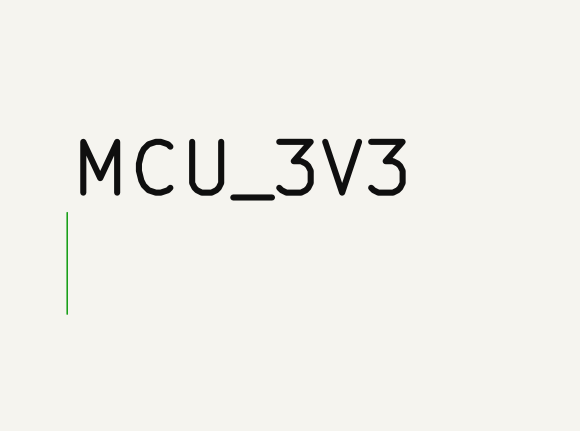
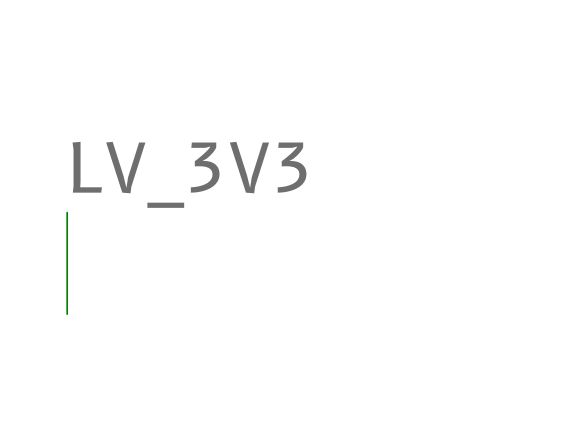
label: MCU_3V3 (242, 169) -> LV_3V3 (189, 174)

